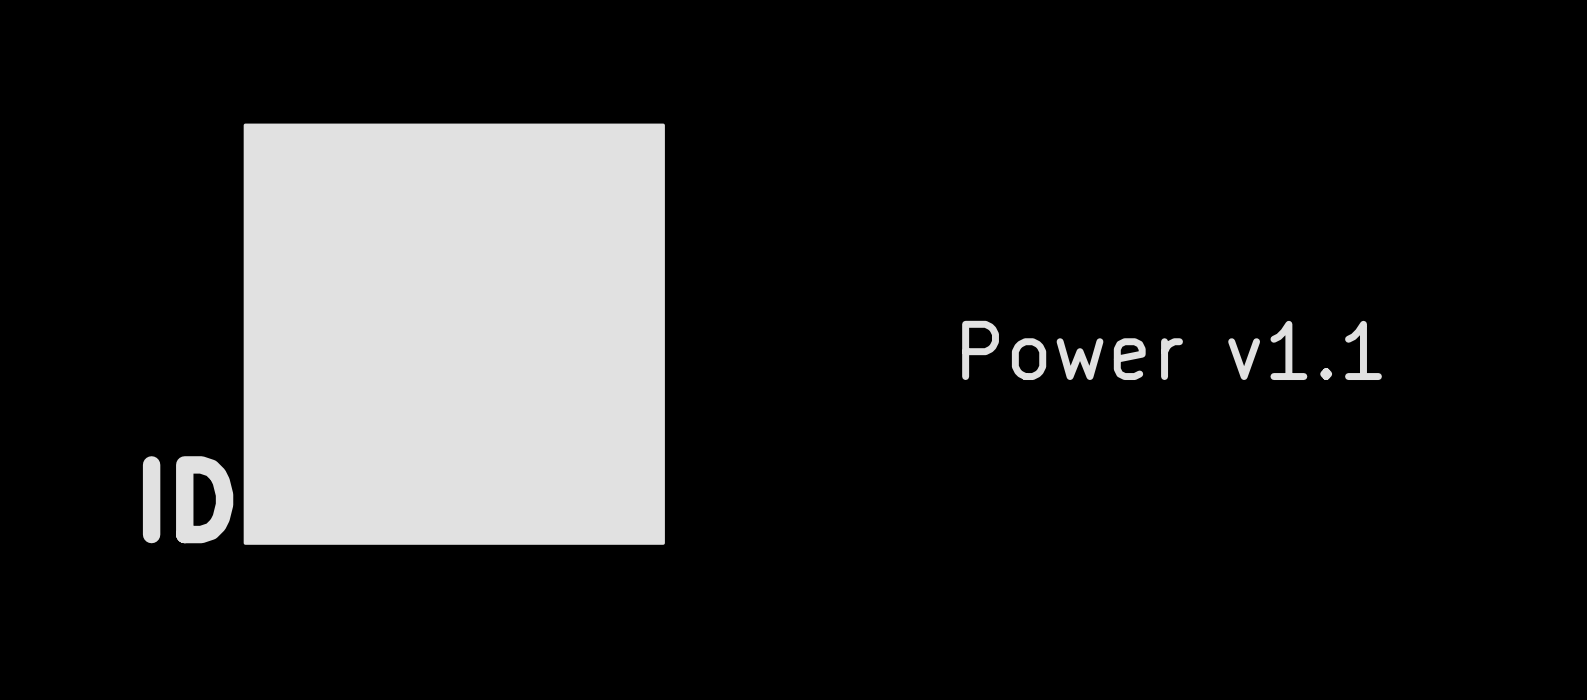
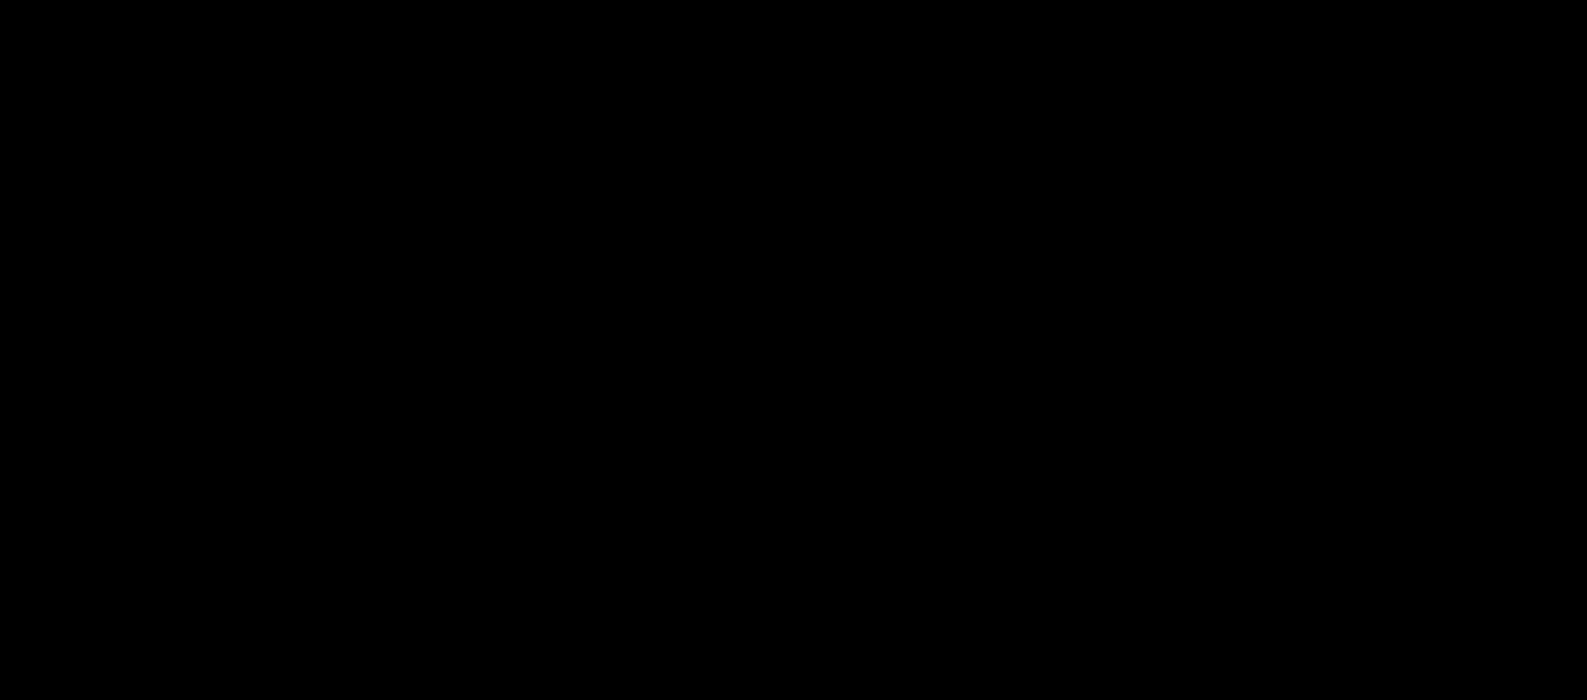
drawing: [243, 123, 665, 545] -> none
text: Power v1.1 (1172, 350) -> none
text: ID (188, 499) -> none

